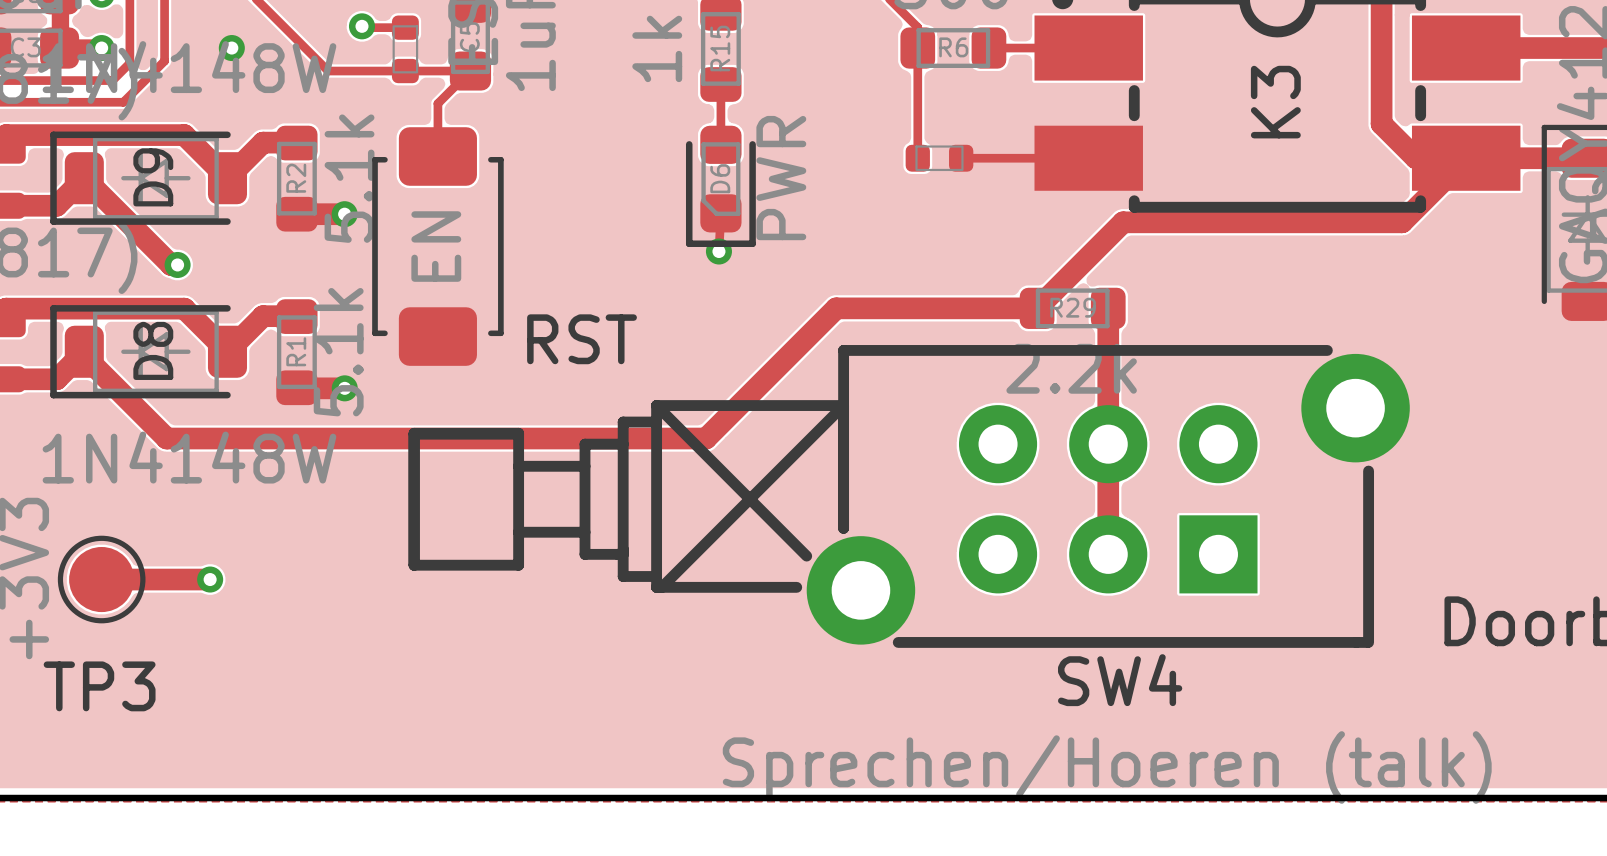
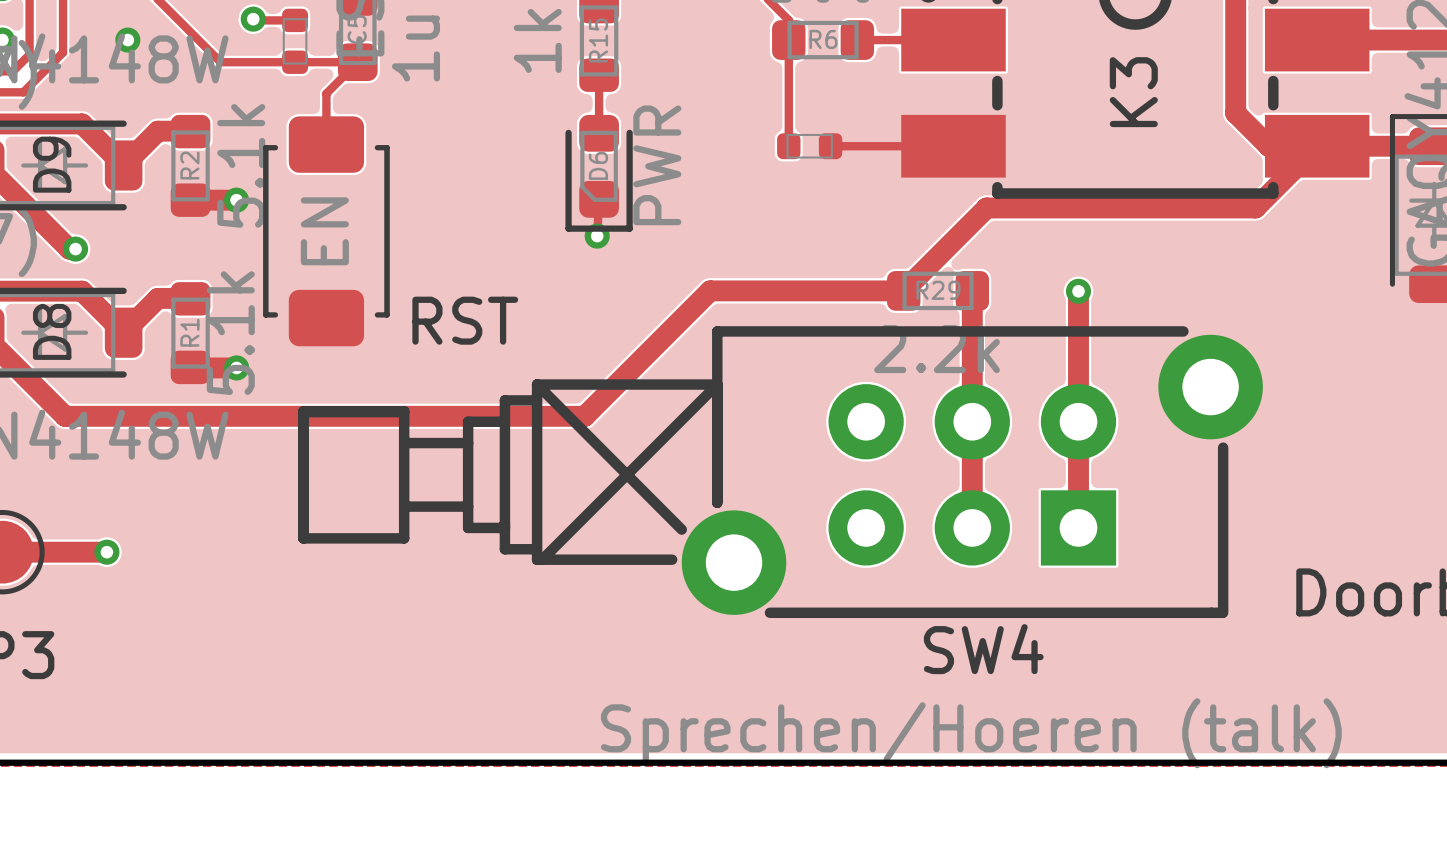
track: none -> (1078, 291) (1078, 527)
via: none -> (1078, 291)

